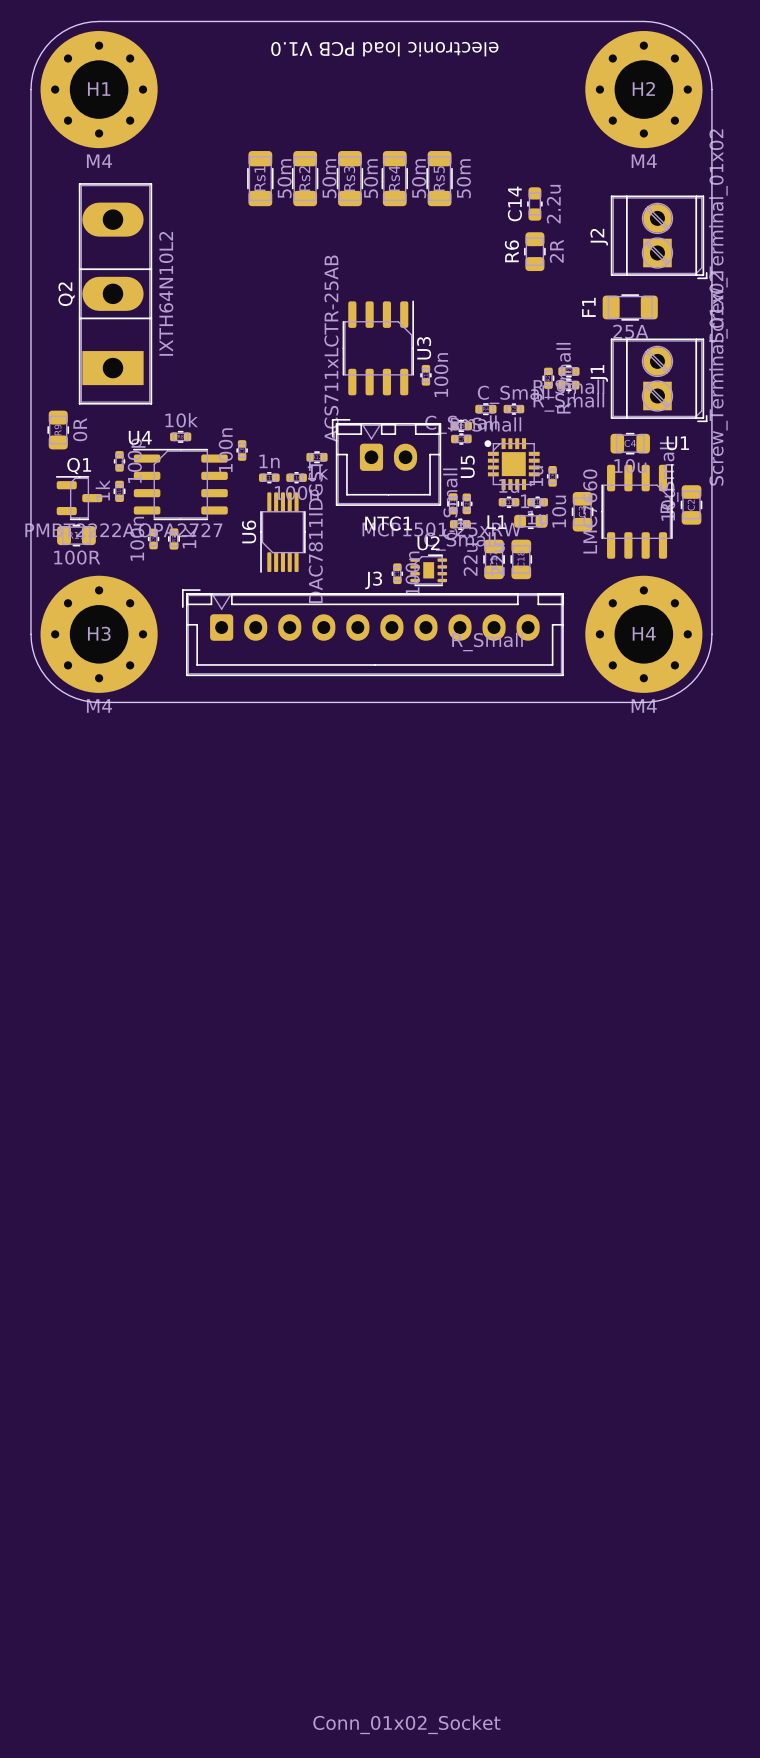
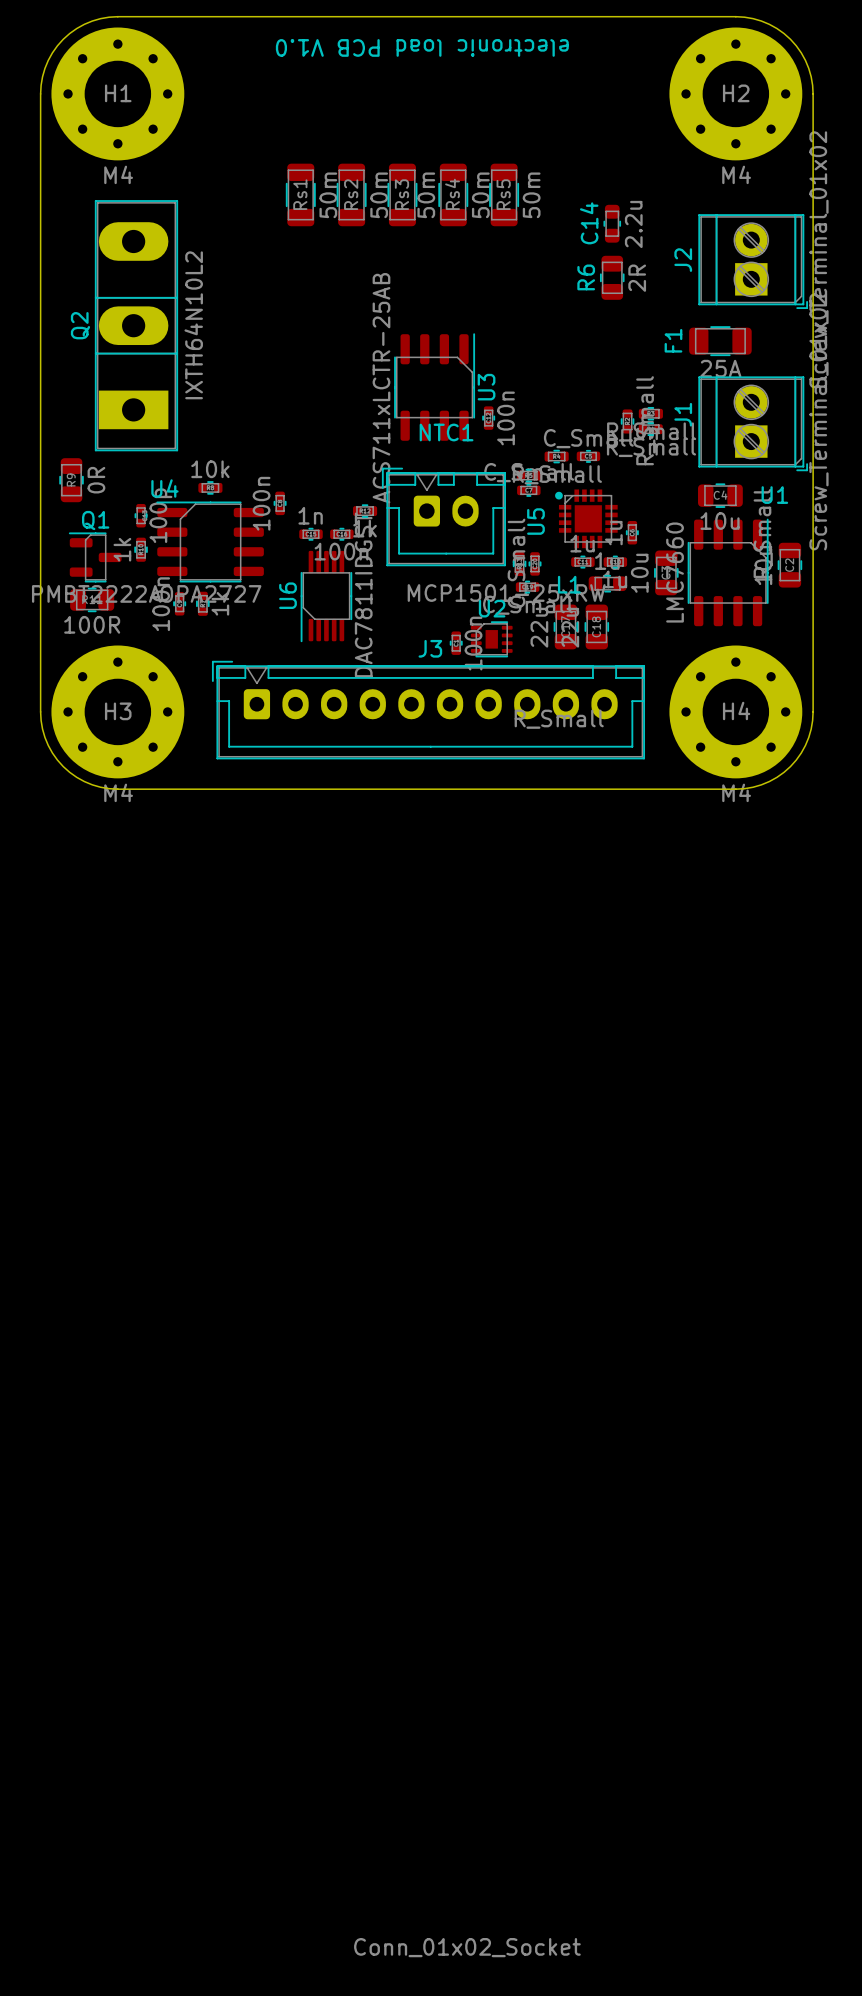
NTC1 name position: NTC1 (388, 523) -> NTC1 (446, 432)

